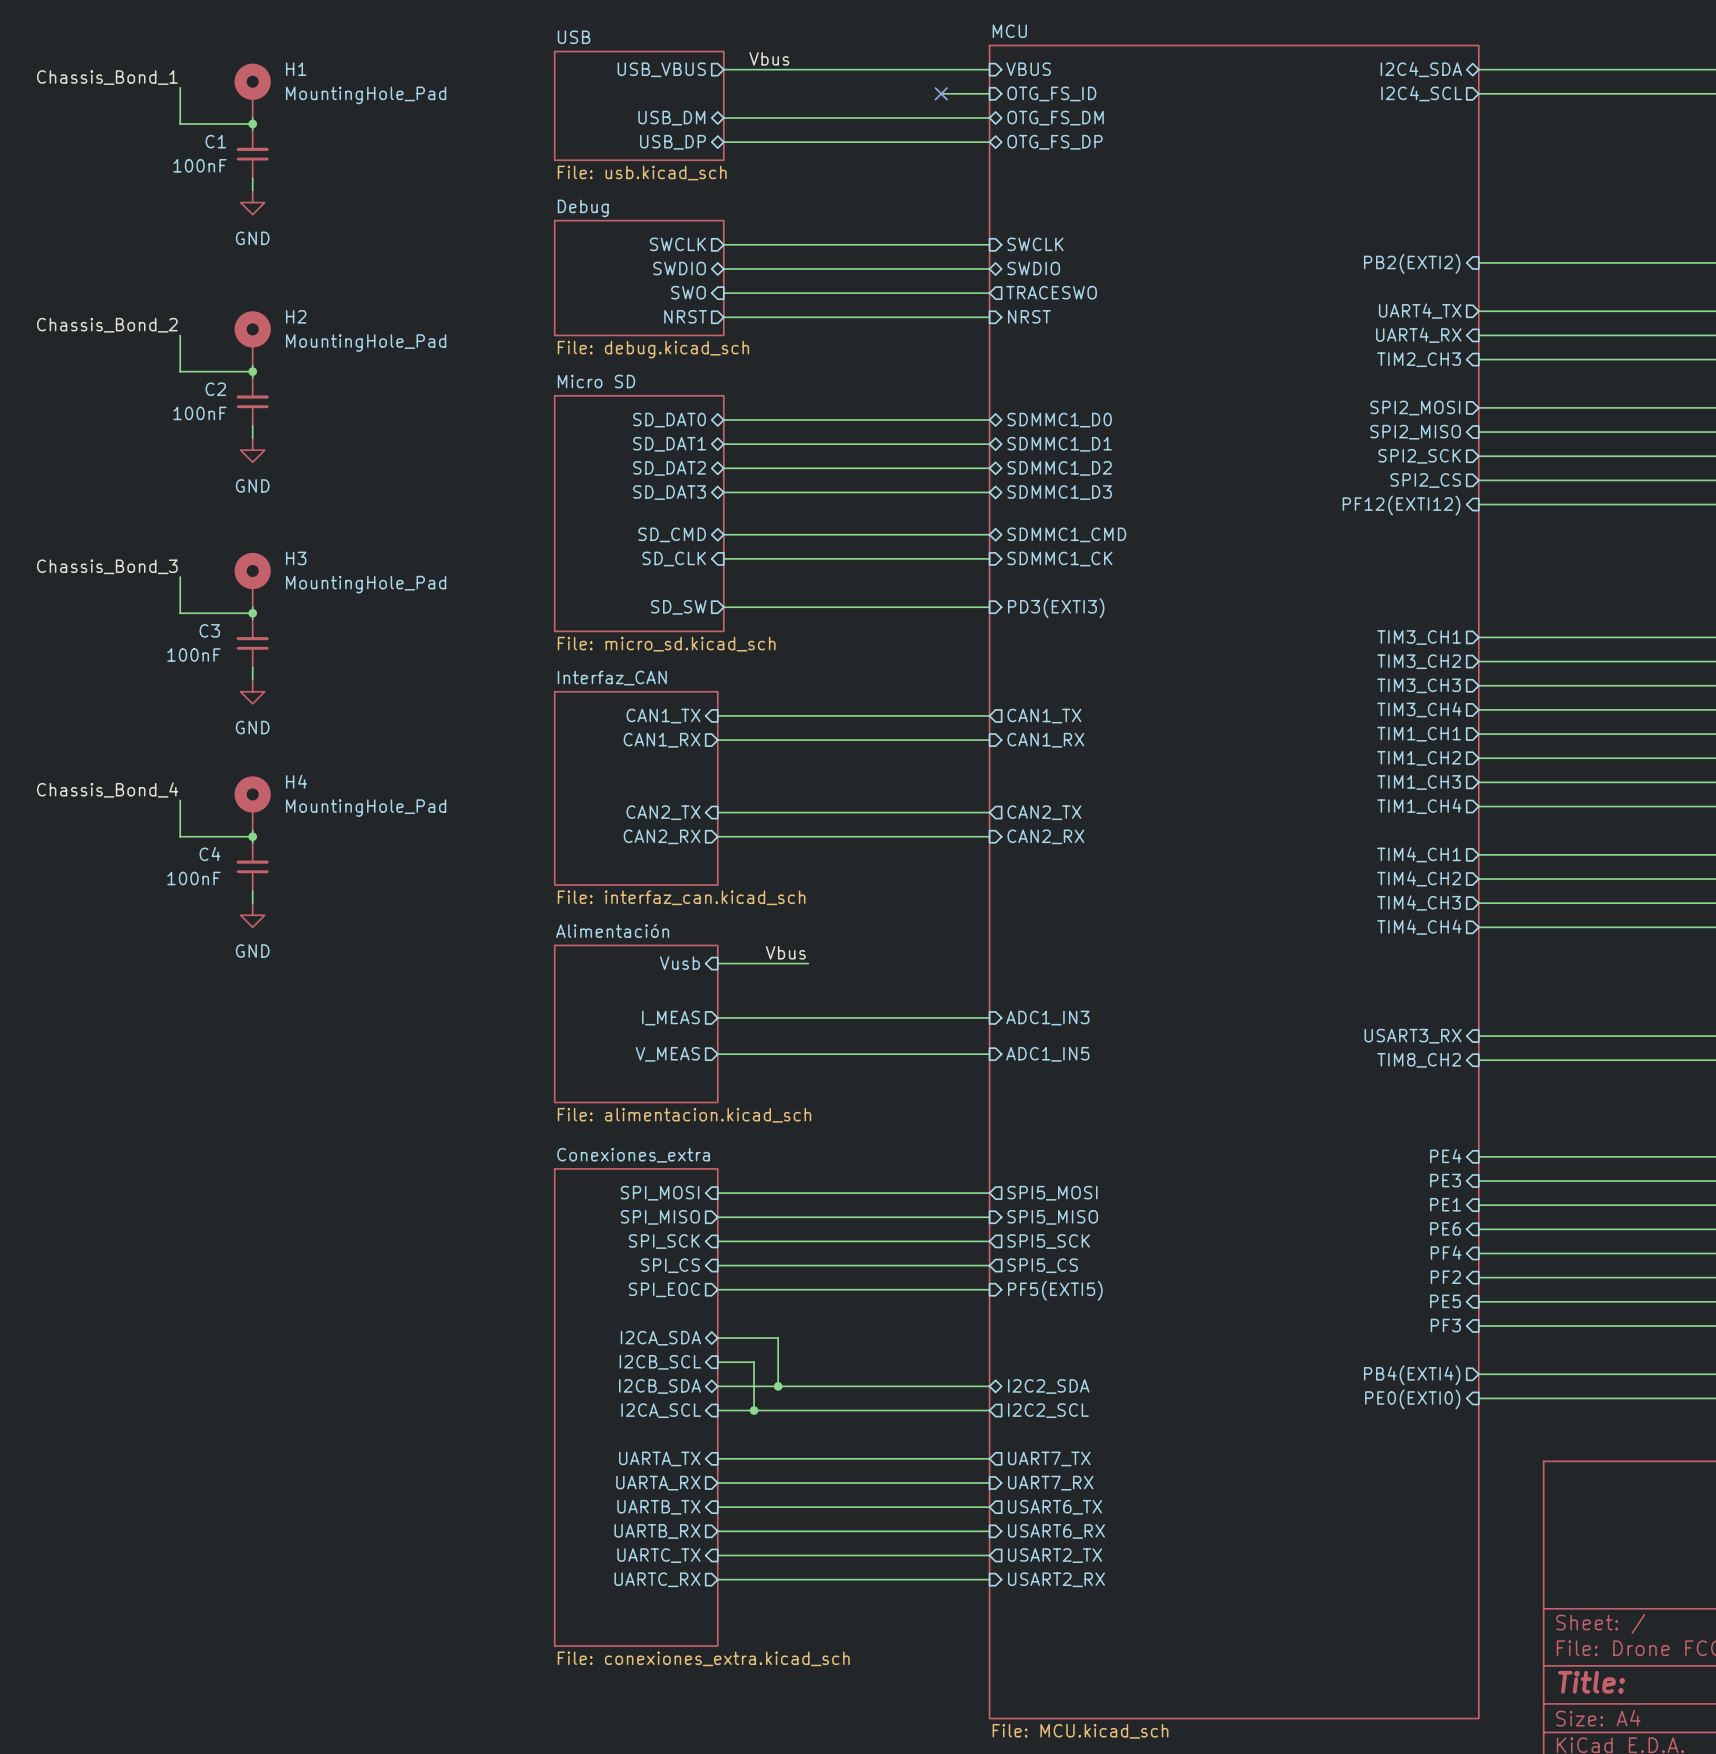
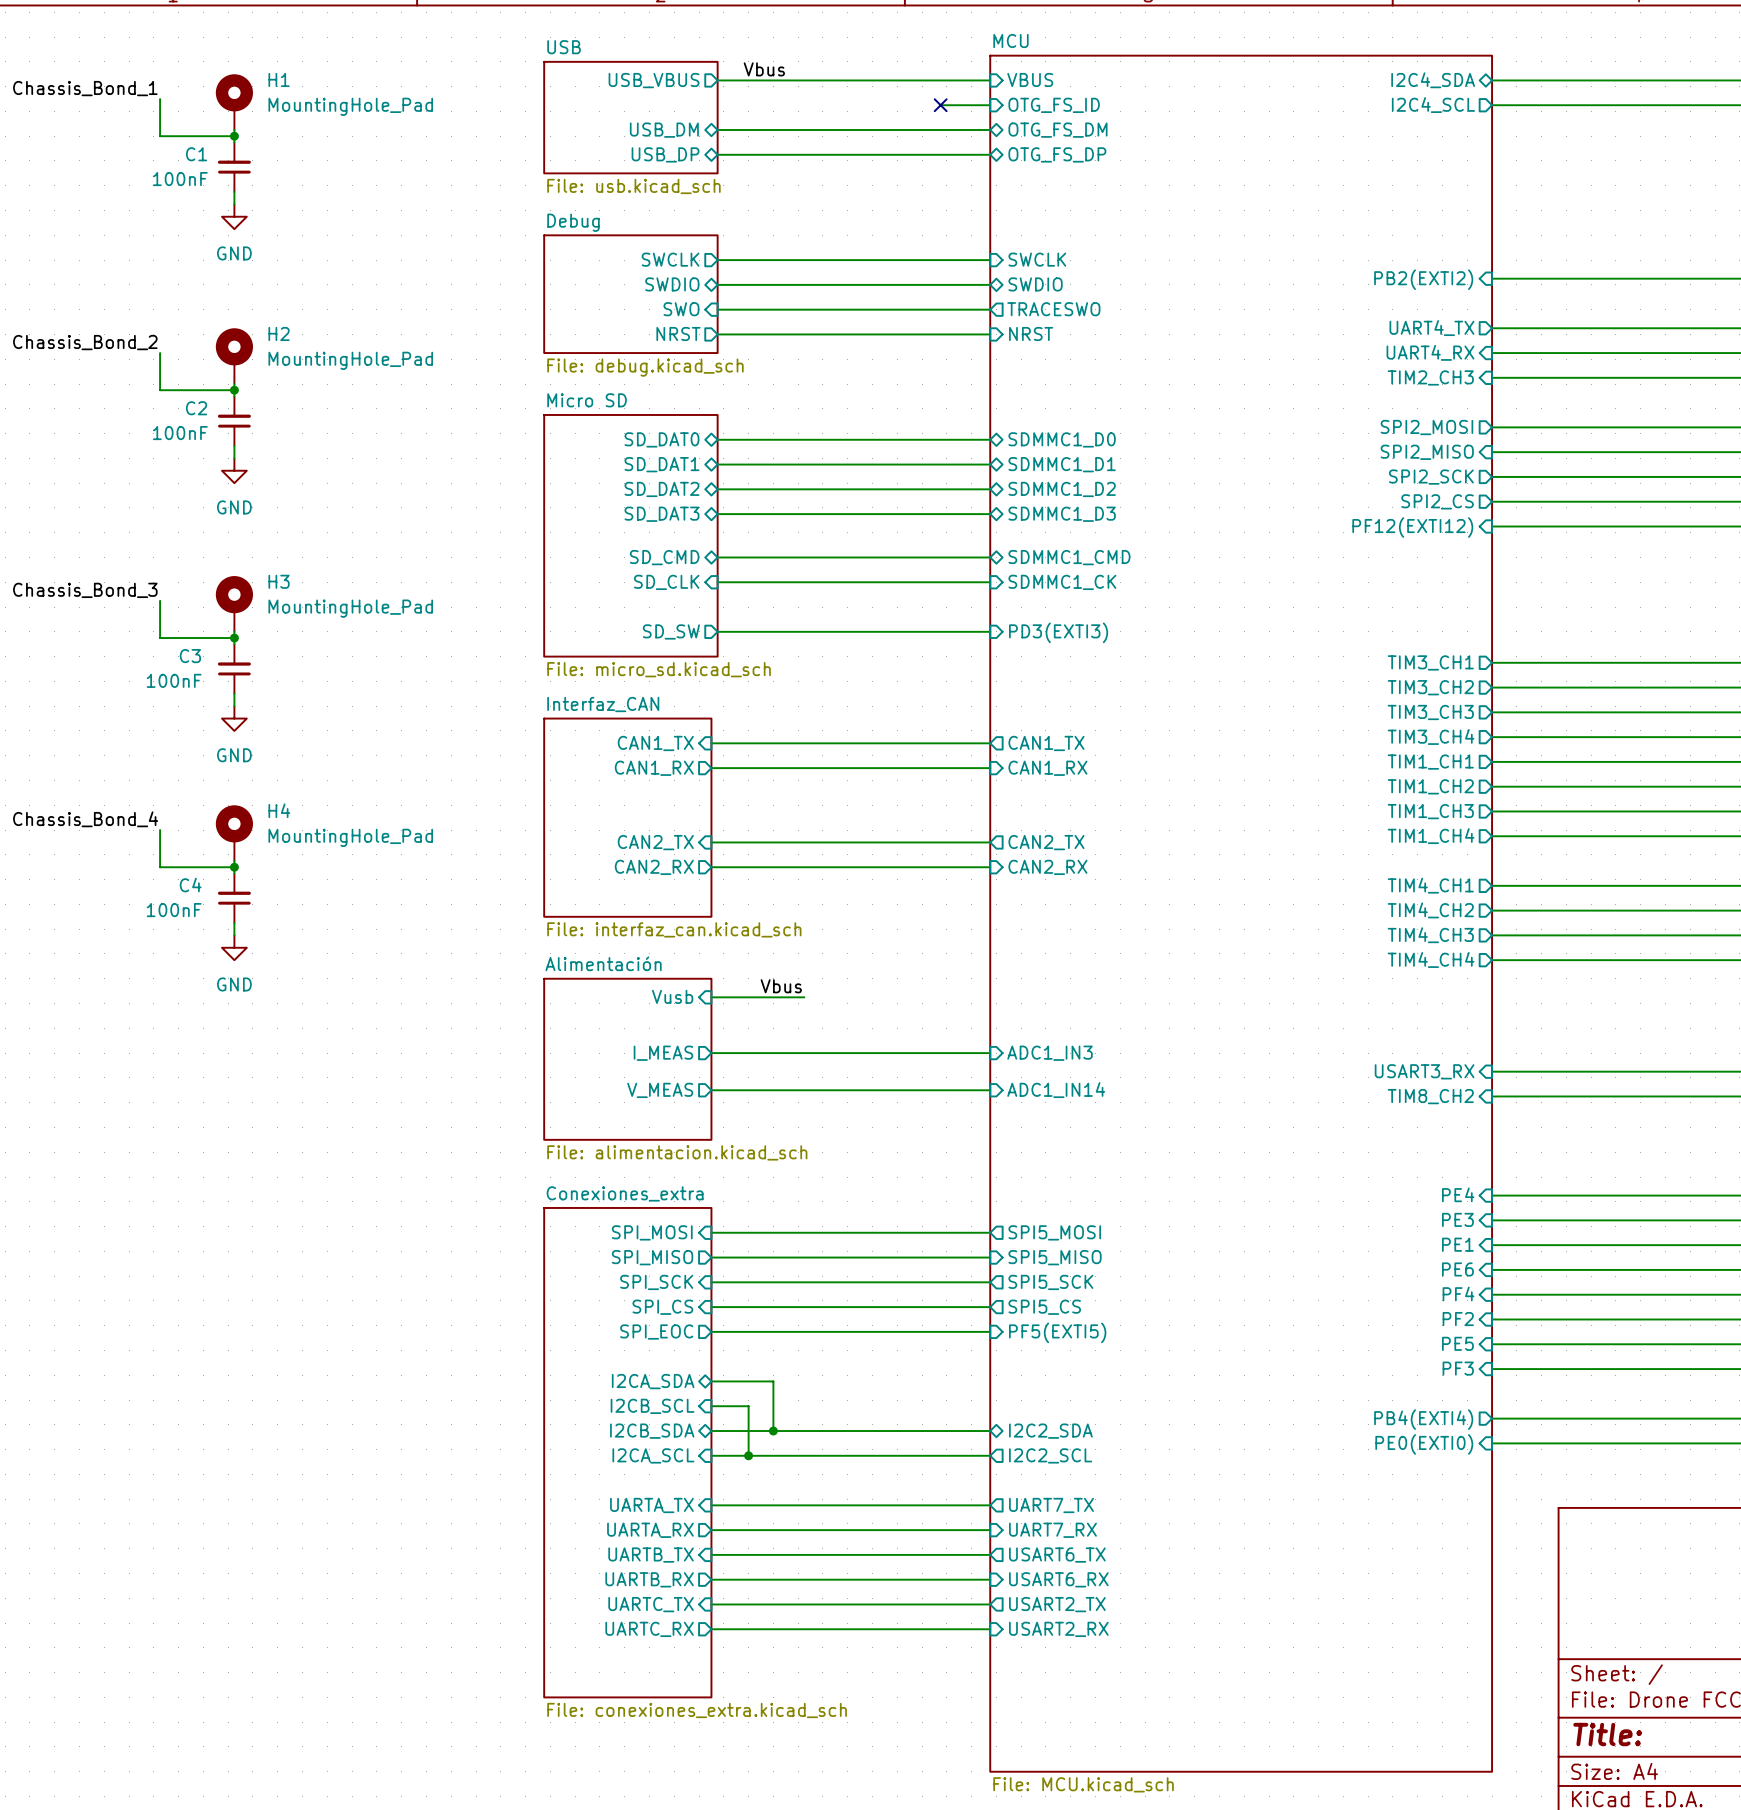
sheet pin: ADC1_IN5 (1047, 1054) -> ADC1_IN14 (1056, 1090)

